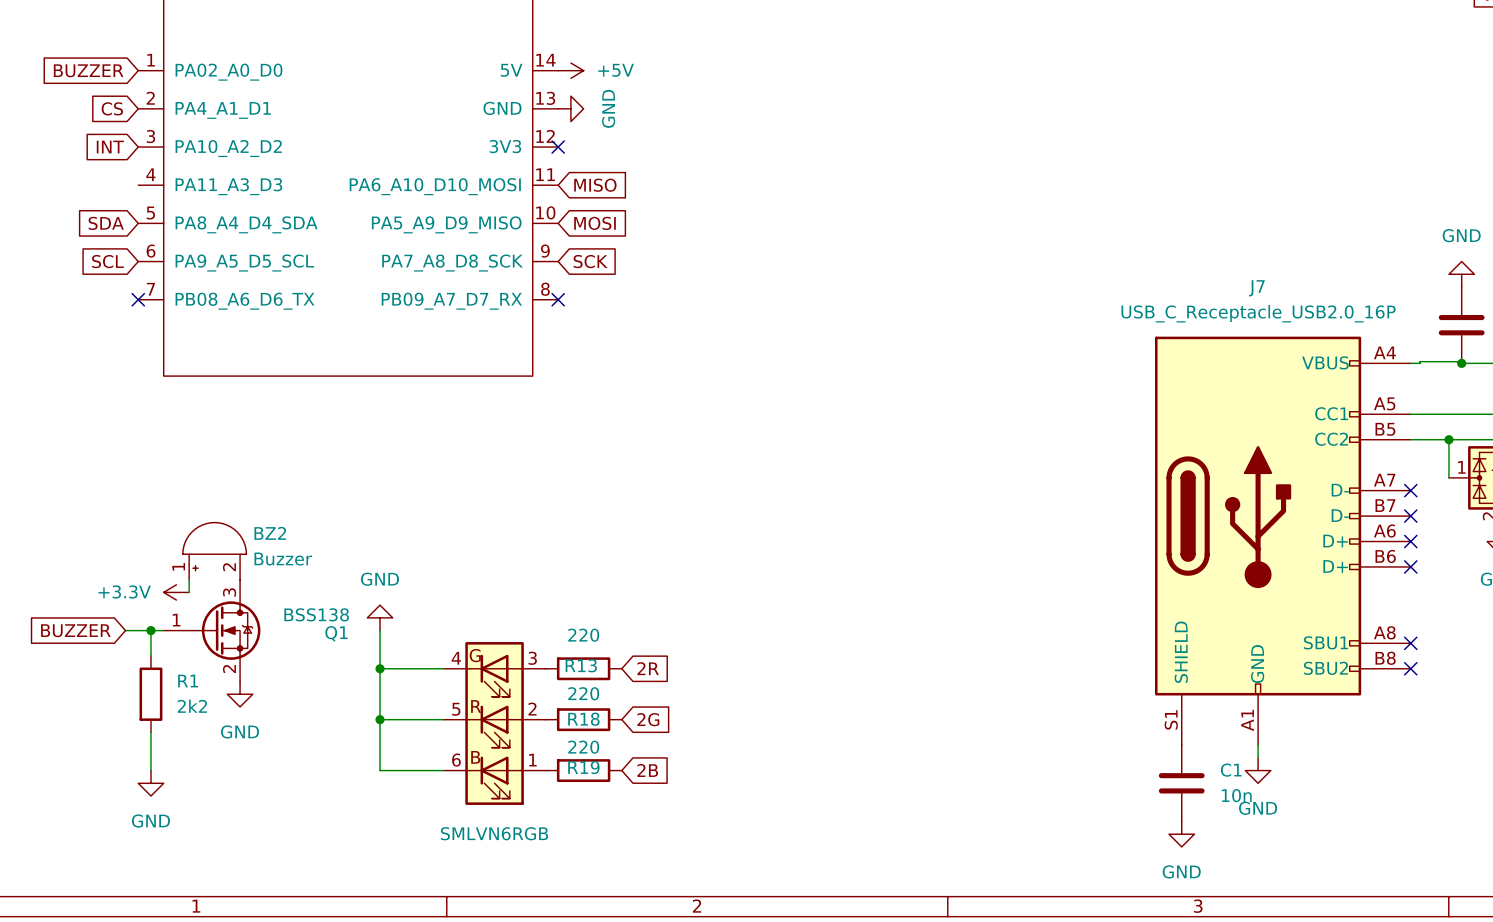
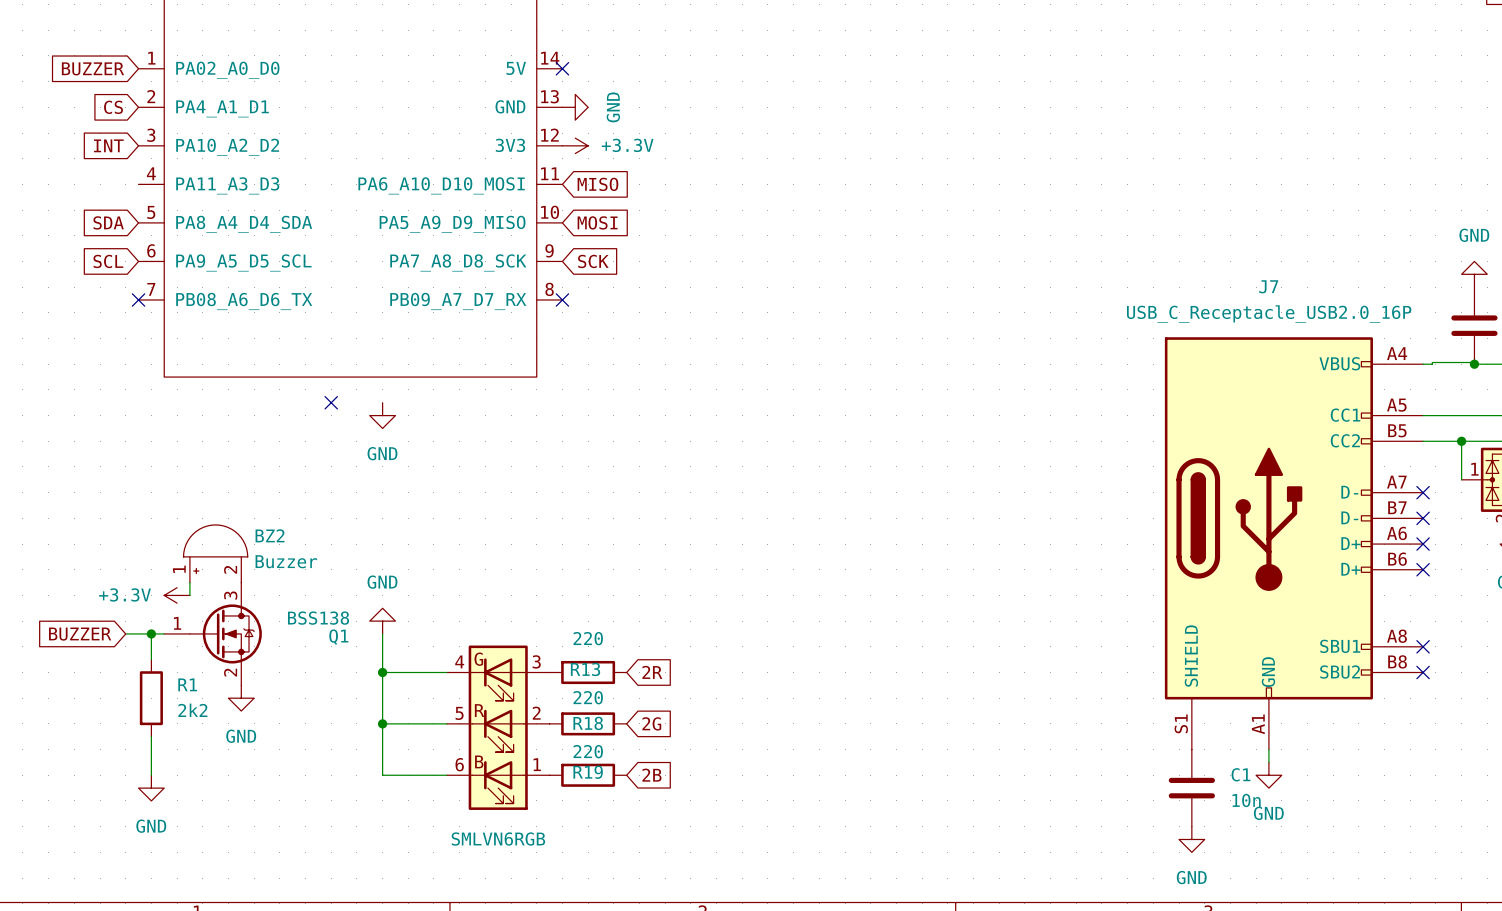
no-connect mark: none -> (562, 68)
power symbol: +5V (570, 70) -> none
no-connect mark: (558, 147) -> none
power symbol: none -> +3.3V (575, 145)
no-connect mark: none -> (331, 402)
power symbol: none -> GND (382, 415)

